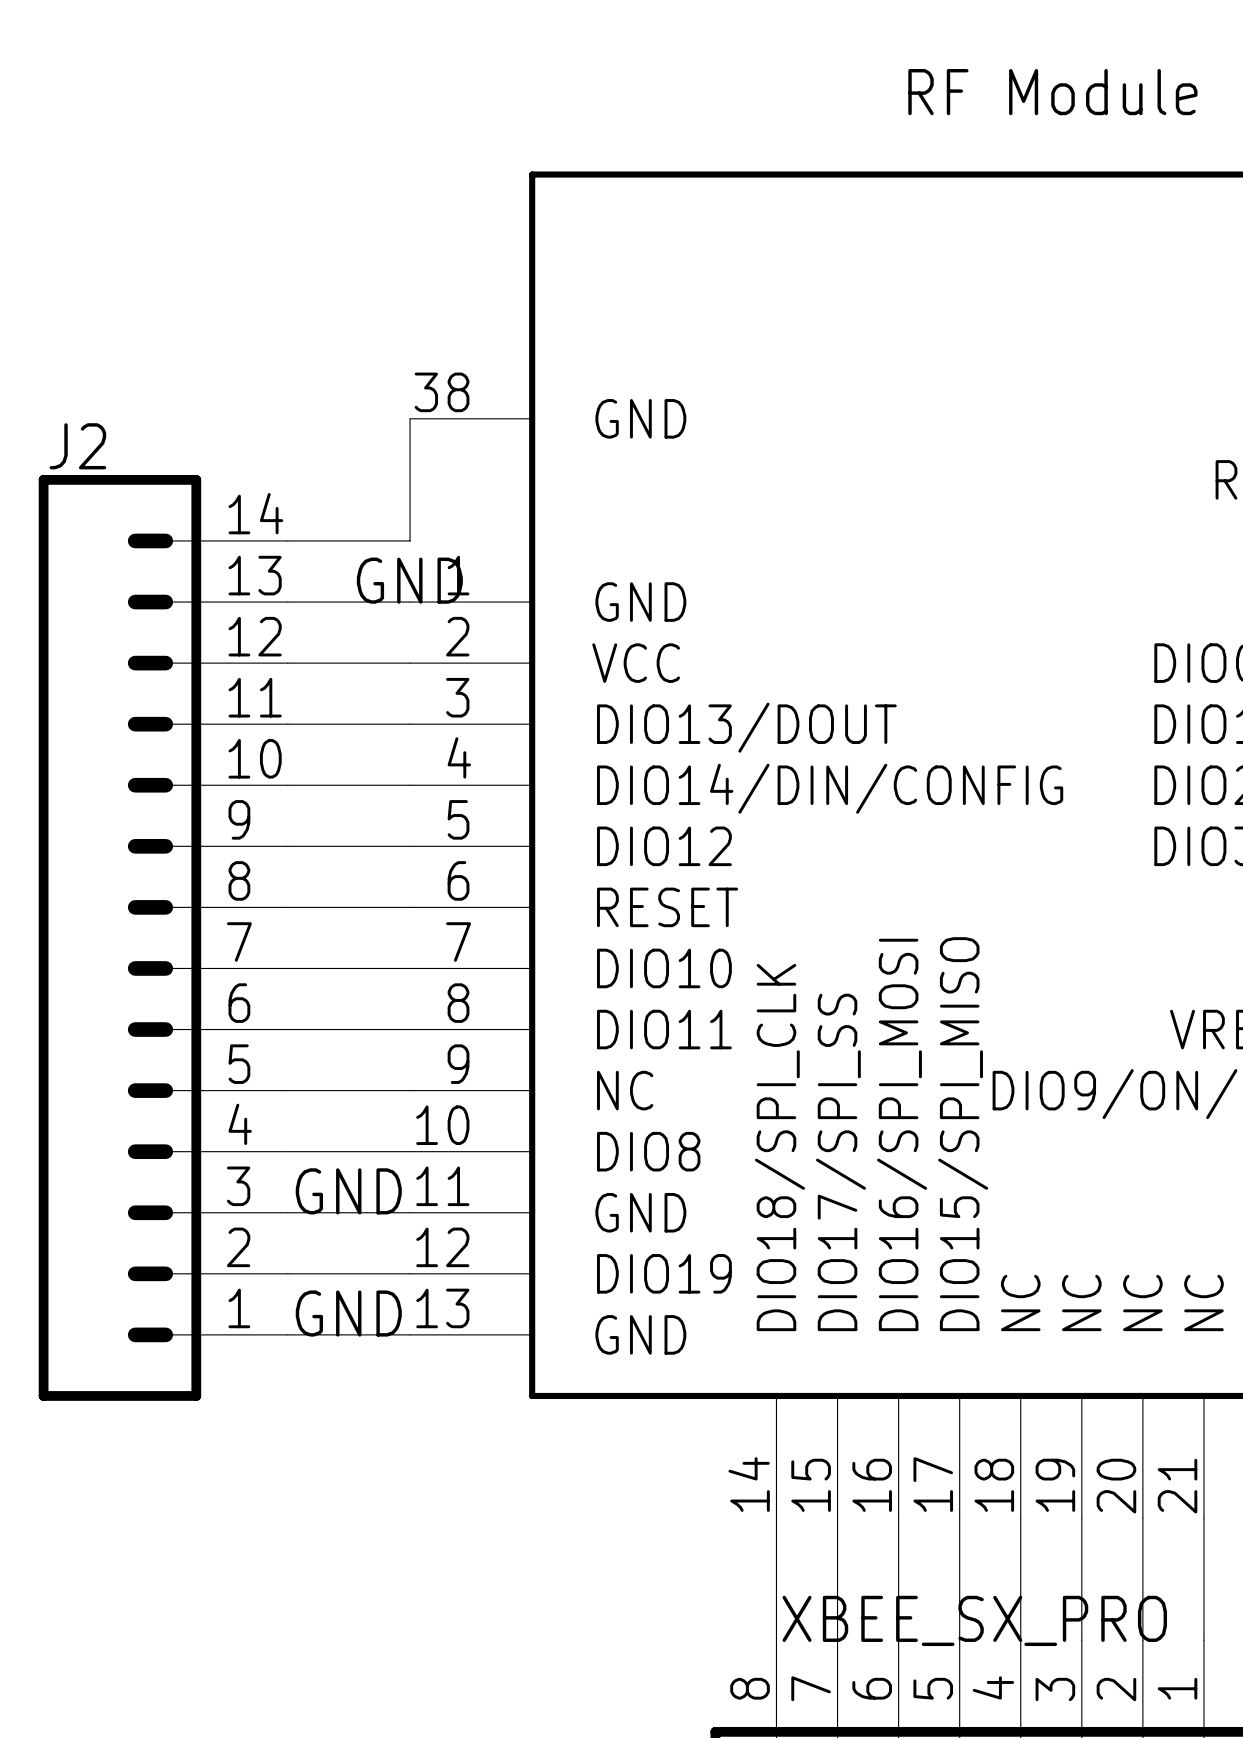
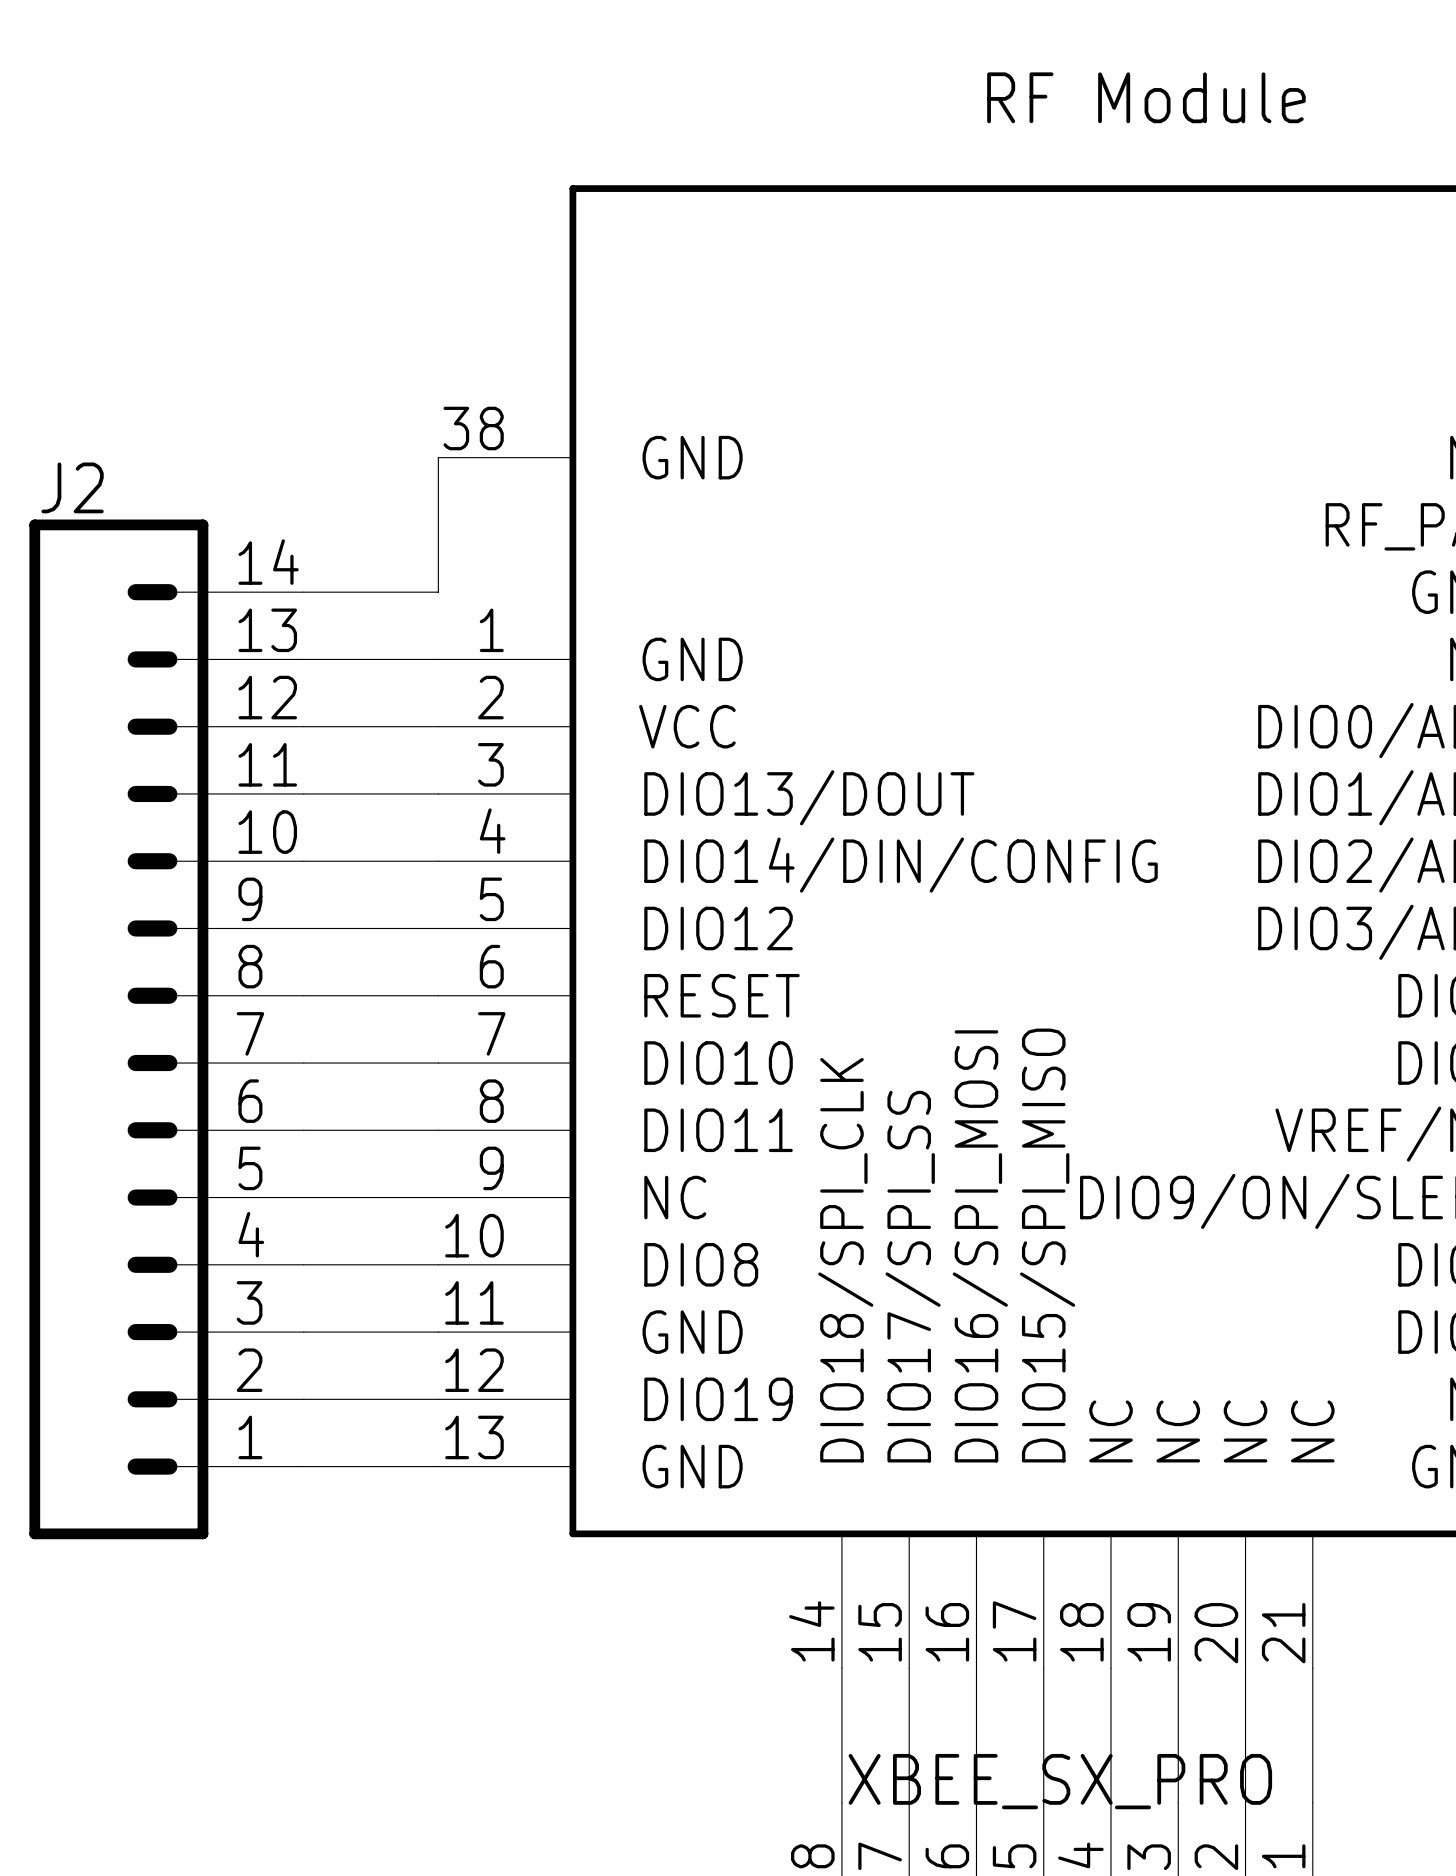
label: GND (409, 580) -> none
label: GND (348, 1191) -> none
label: GND (348, 1313) -> none

